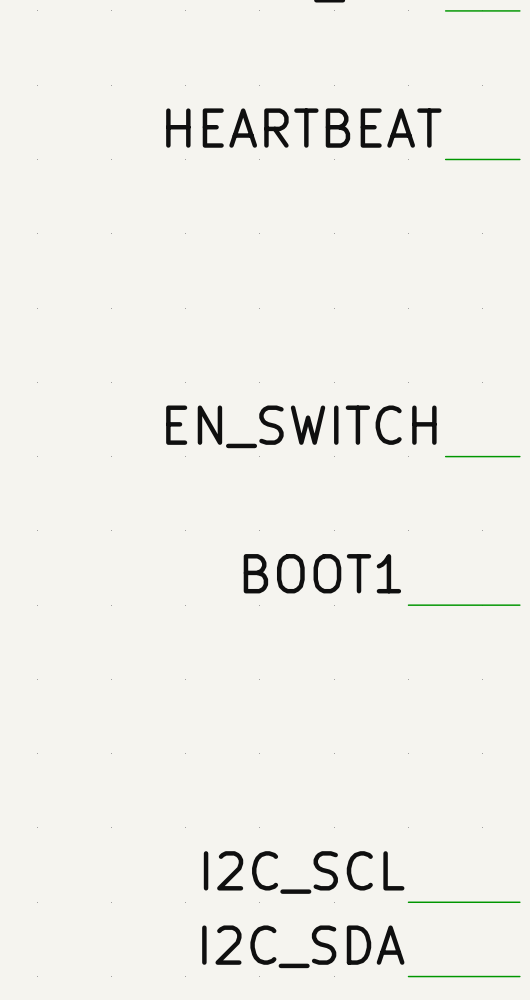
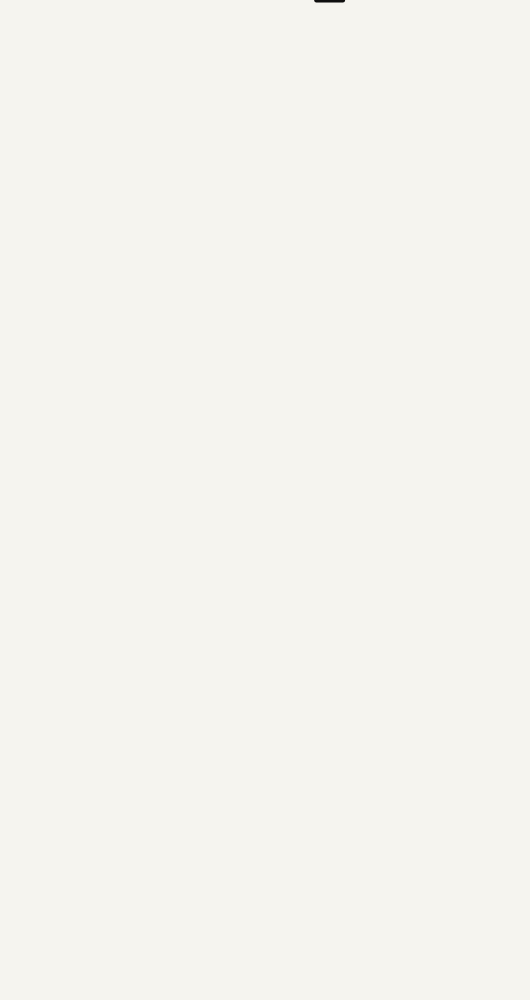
wire: (445, 10) (519, 10) -> none
label: HEARTBEAT (303, 128) -> none
wire: (445, 159) (519, 159) -> none
label: EN_SWITCH (301, 426) -> none
wire: (445, 456) (519, 456) -> none
label: BOOT1 (322, 573) -> none
wire: (408, 605) (519, 605) -> none
label: I2C_SCL (304, 872) -> none
wire: (408, 902) (519, 902) -> none
label: I2C_SDA (303, 946) -> none
wire: (408, 976) (519, 976) -> none

